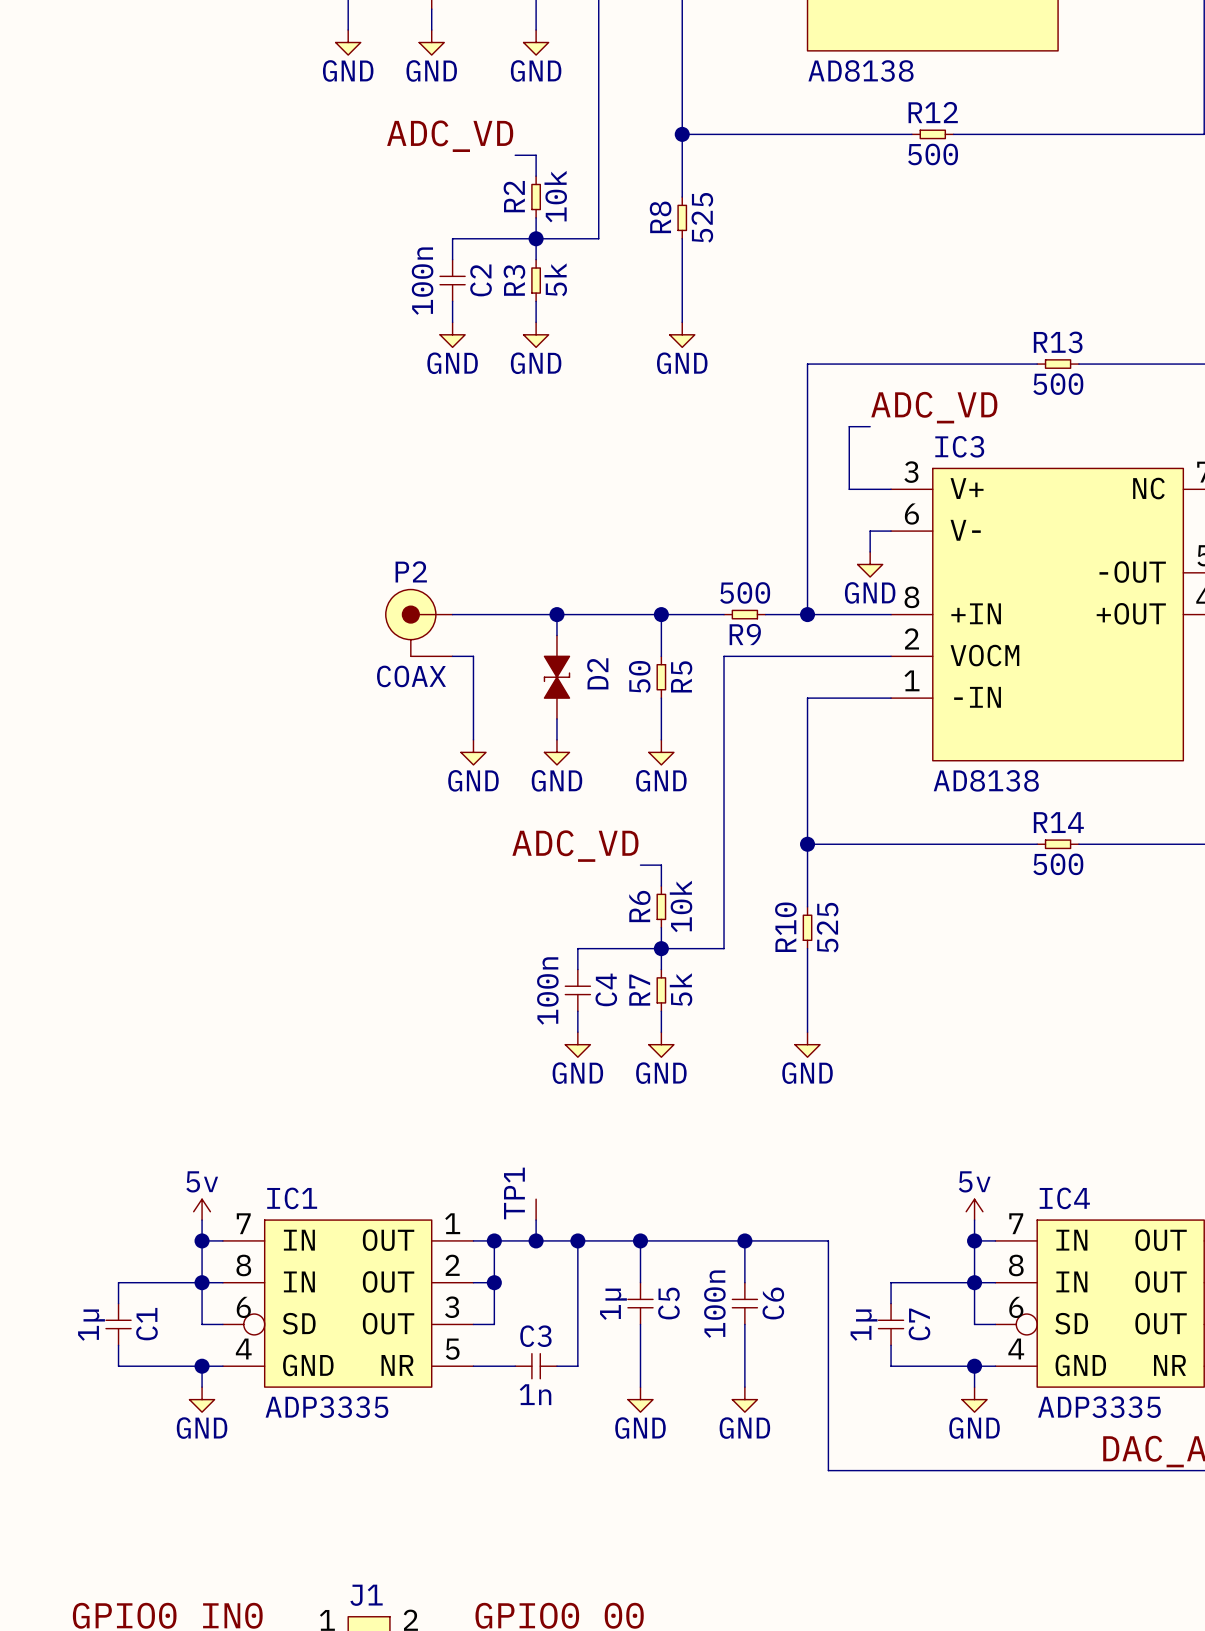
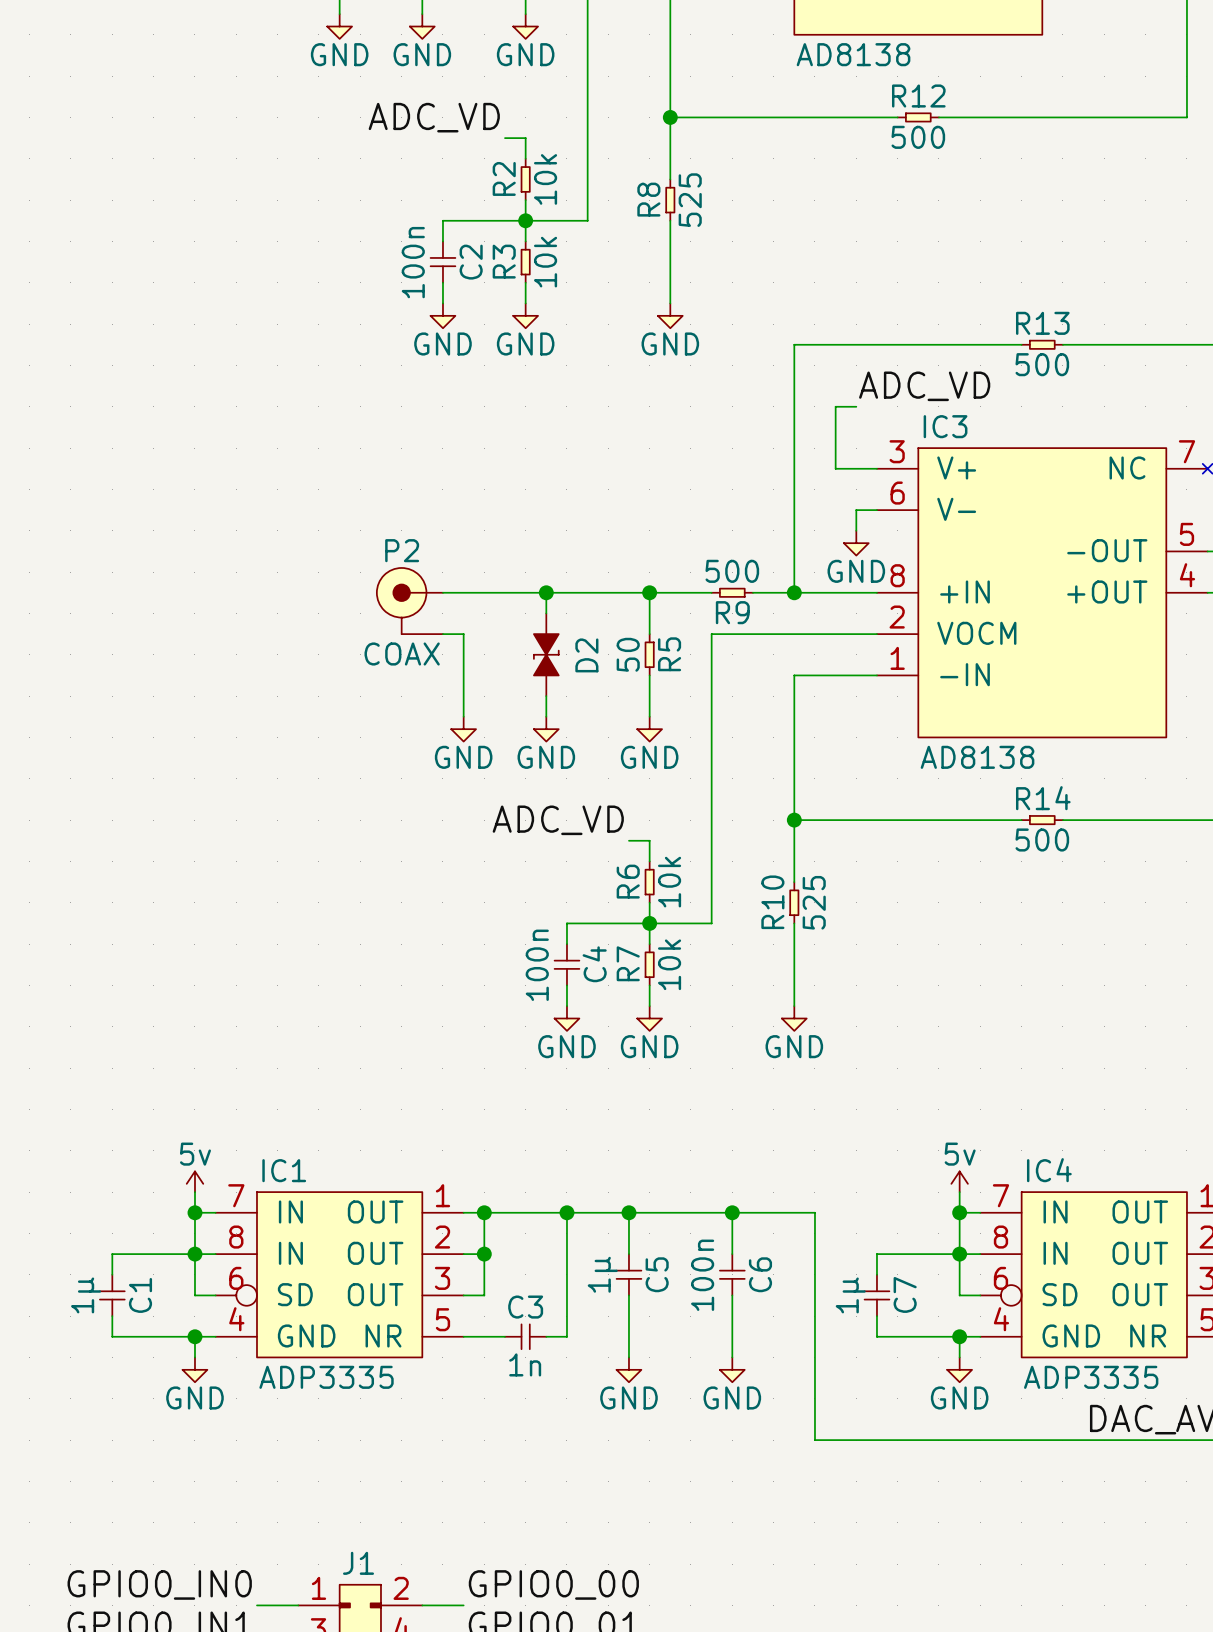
R3 value: 5k (555, 279) -> 10k (545, 262)
R7 value: 5k (681, 989) -> 10k (669, 964)
TP1: (536, 1204) -> none
wire: (536, 1220) (536, 1240) -> none
junction: (536, 1240) -> none

